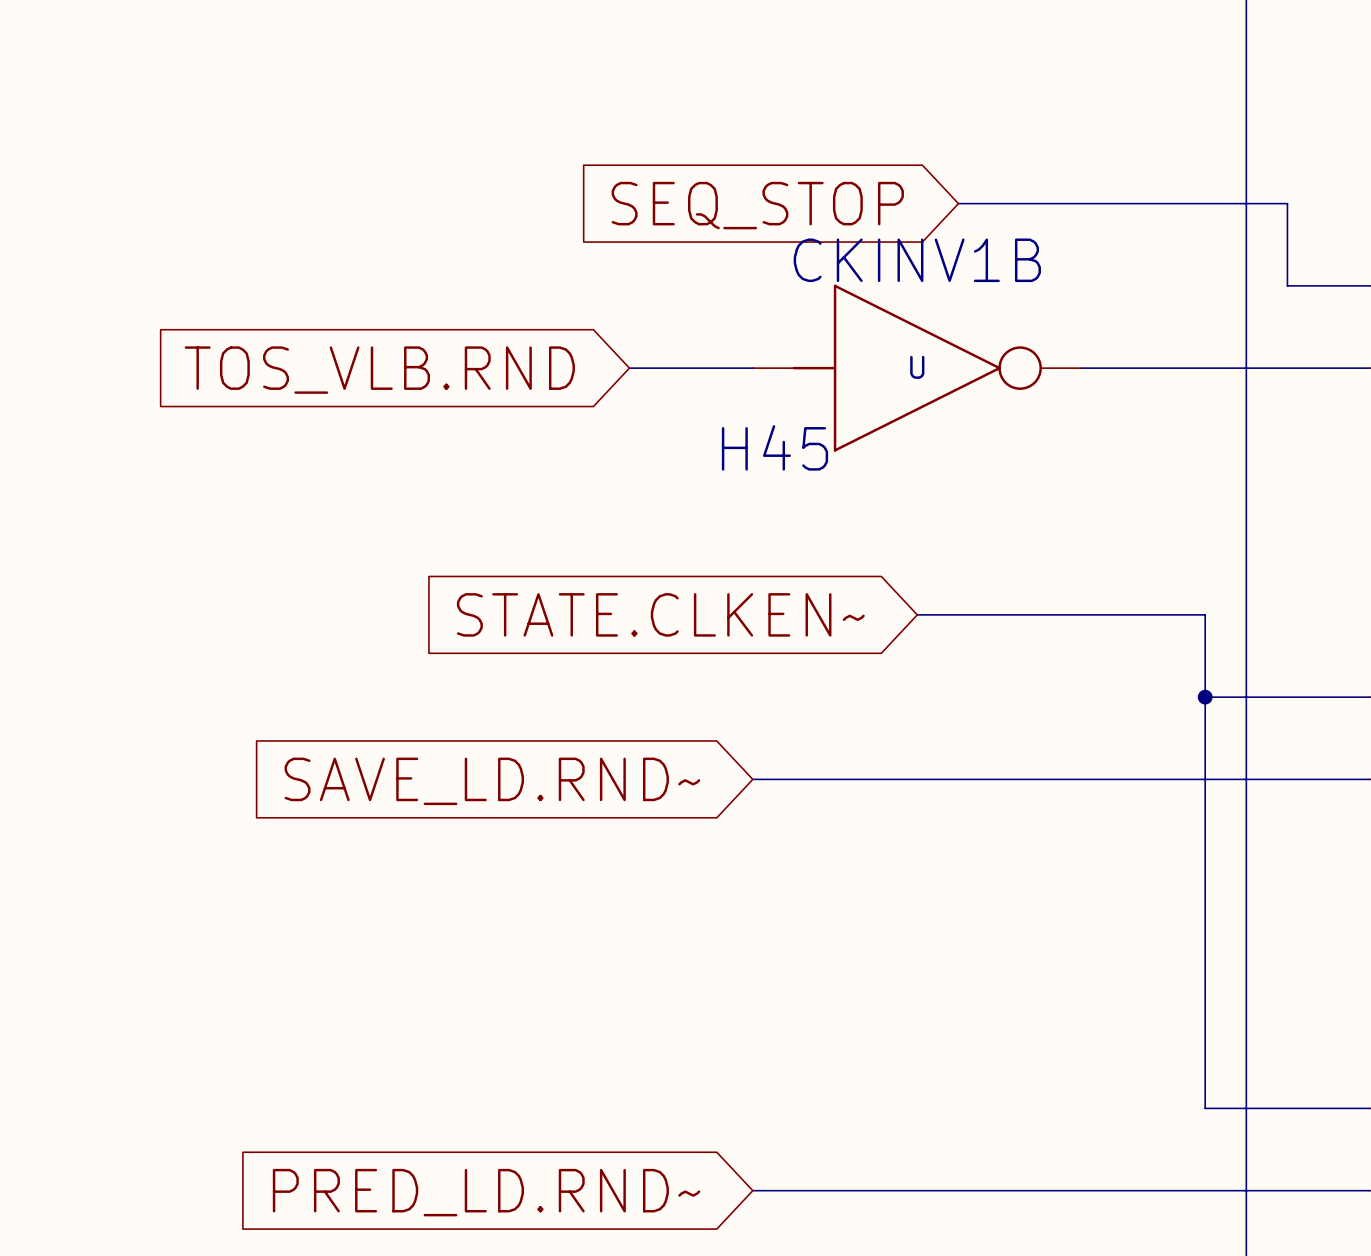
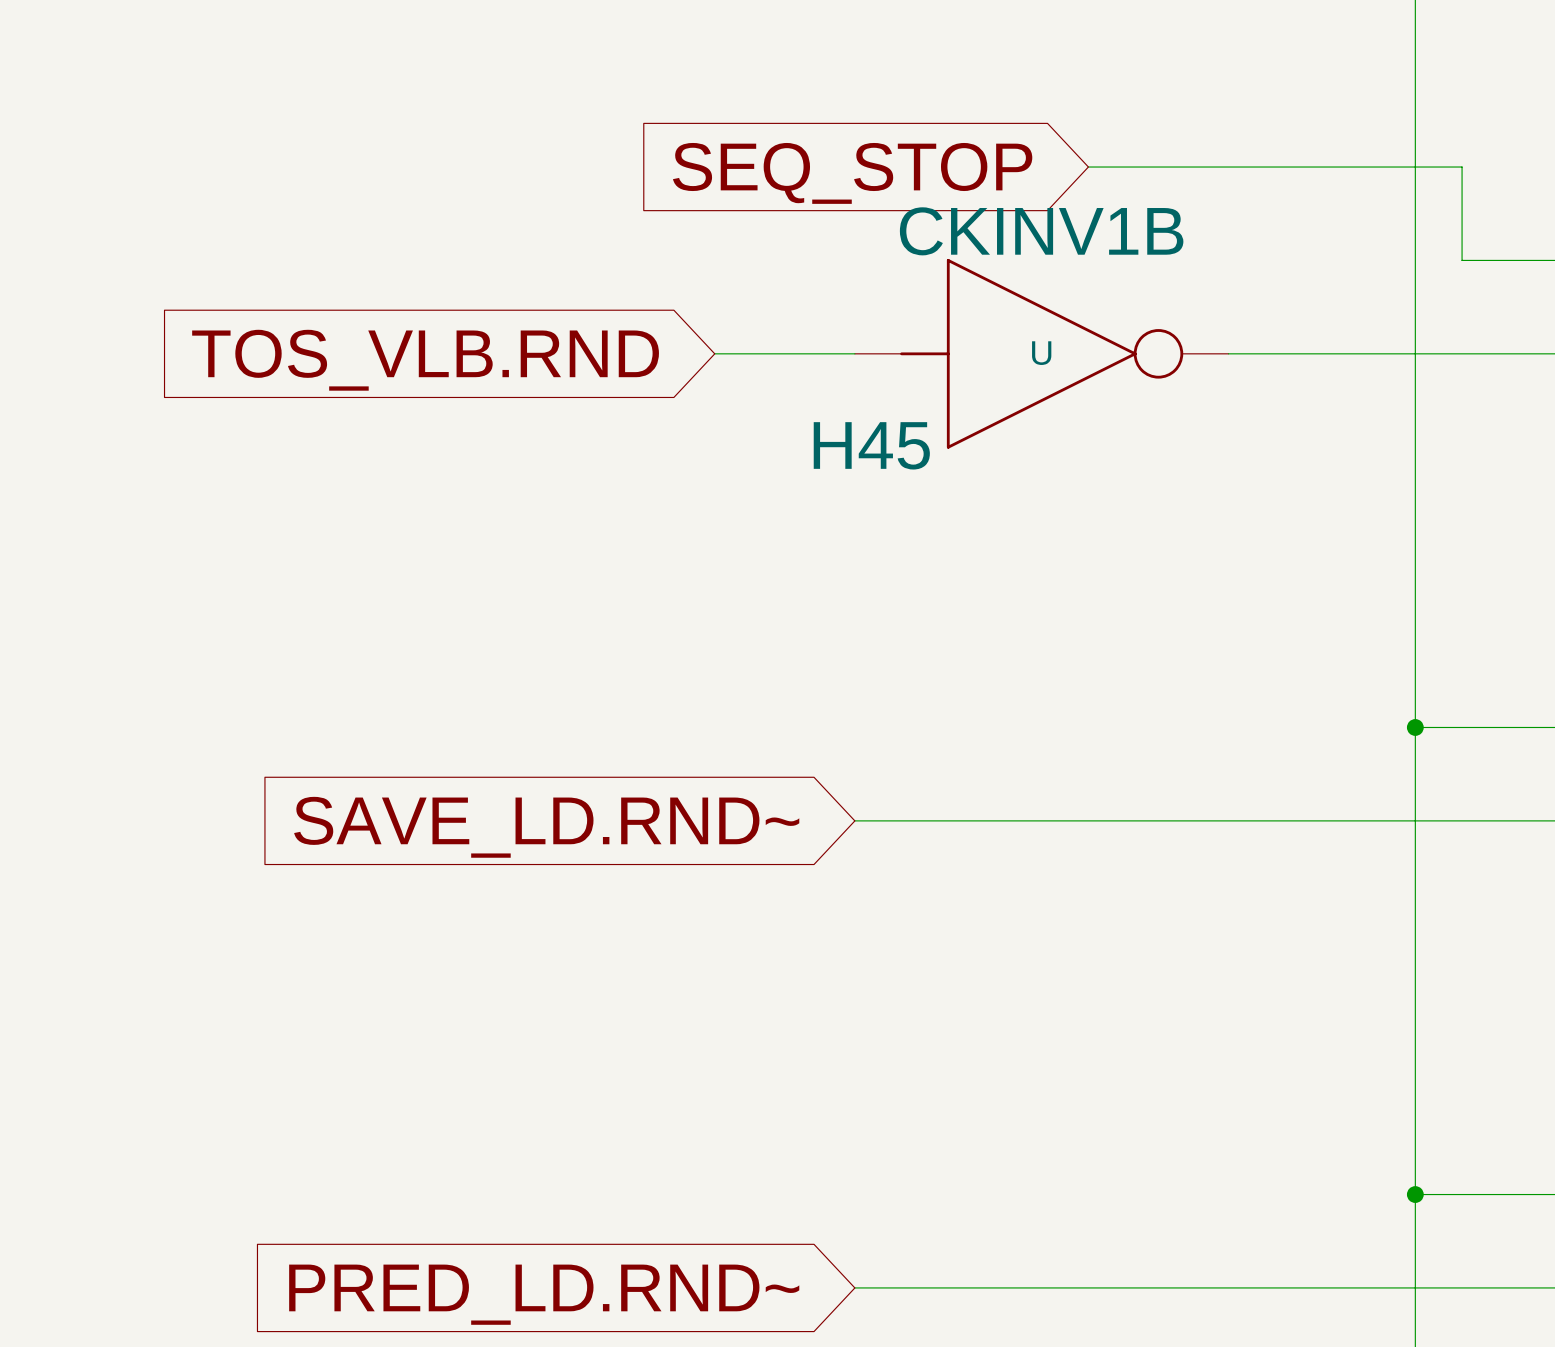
global label: STATE.CLKEN~ (660, 614) -> none
wire: (917, 614) (1205, 614) (1205, 1108) (1246, 1108) -> none
wire: (1205, 697) (1246, 697) -> none
junction position: (1205, 697) -> (1415, 727)
junction: none -> (1415, 1194)

